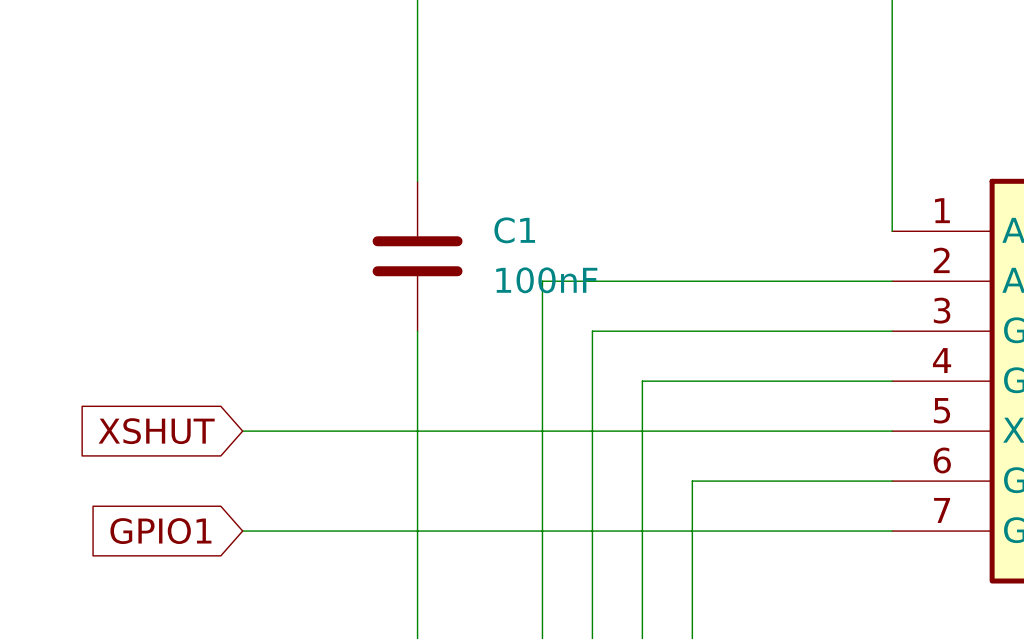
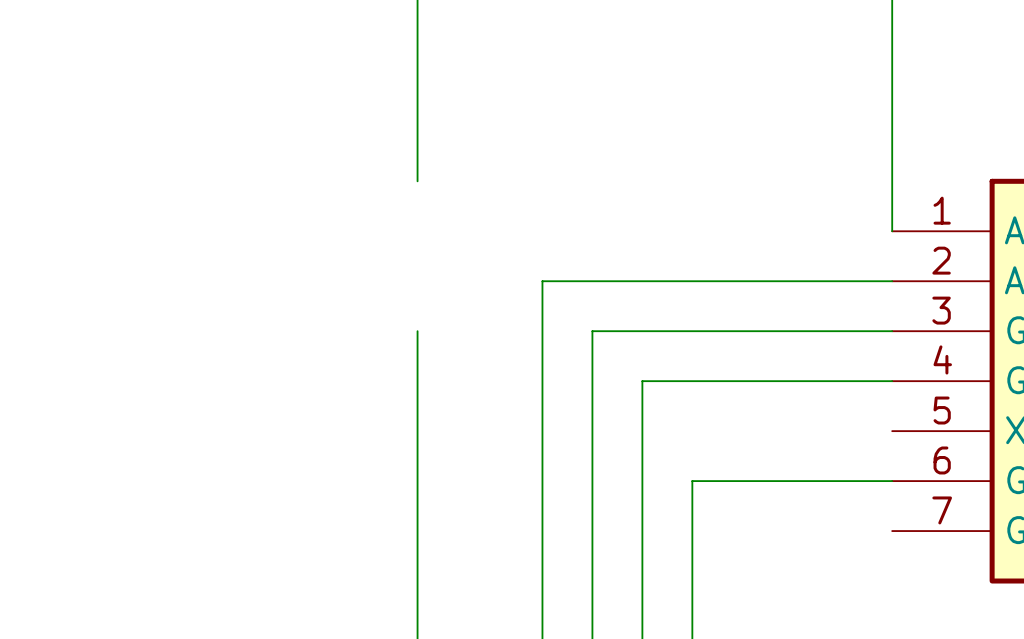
C1: 100nF (417, 256) -> none
global label: XSHUT (156, 431) -> none
wire: (242, 431) (892, 431) -> none
global label: GPIO1 (160, 531) -> none
wire: (242, 531) (892, 531) -> none

